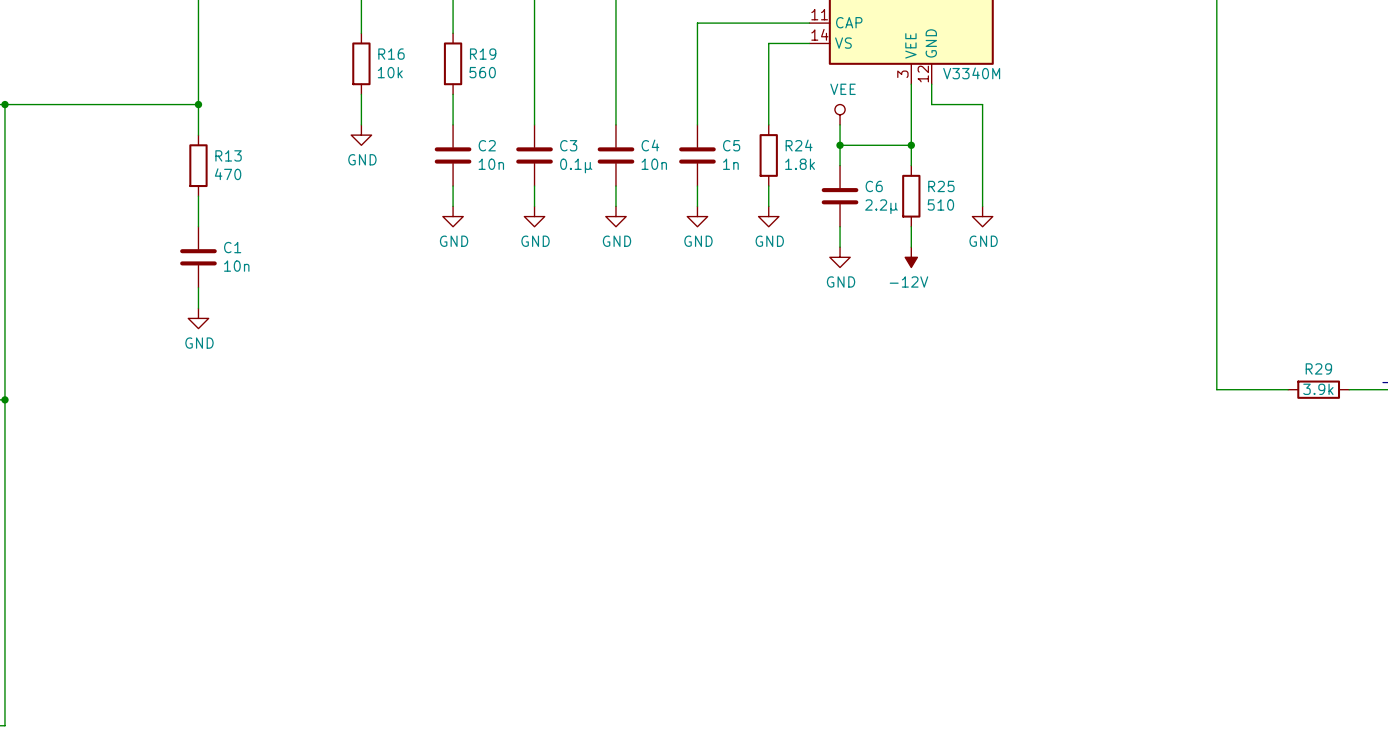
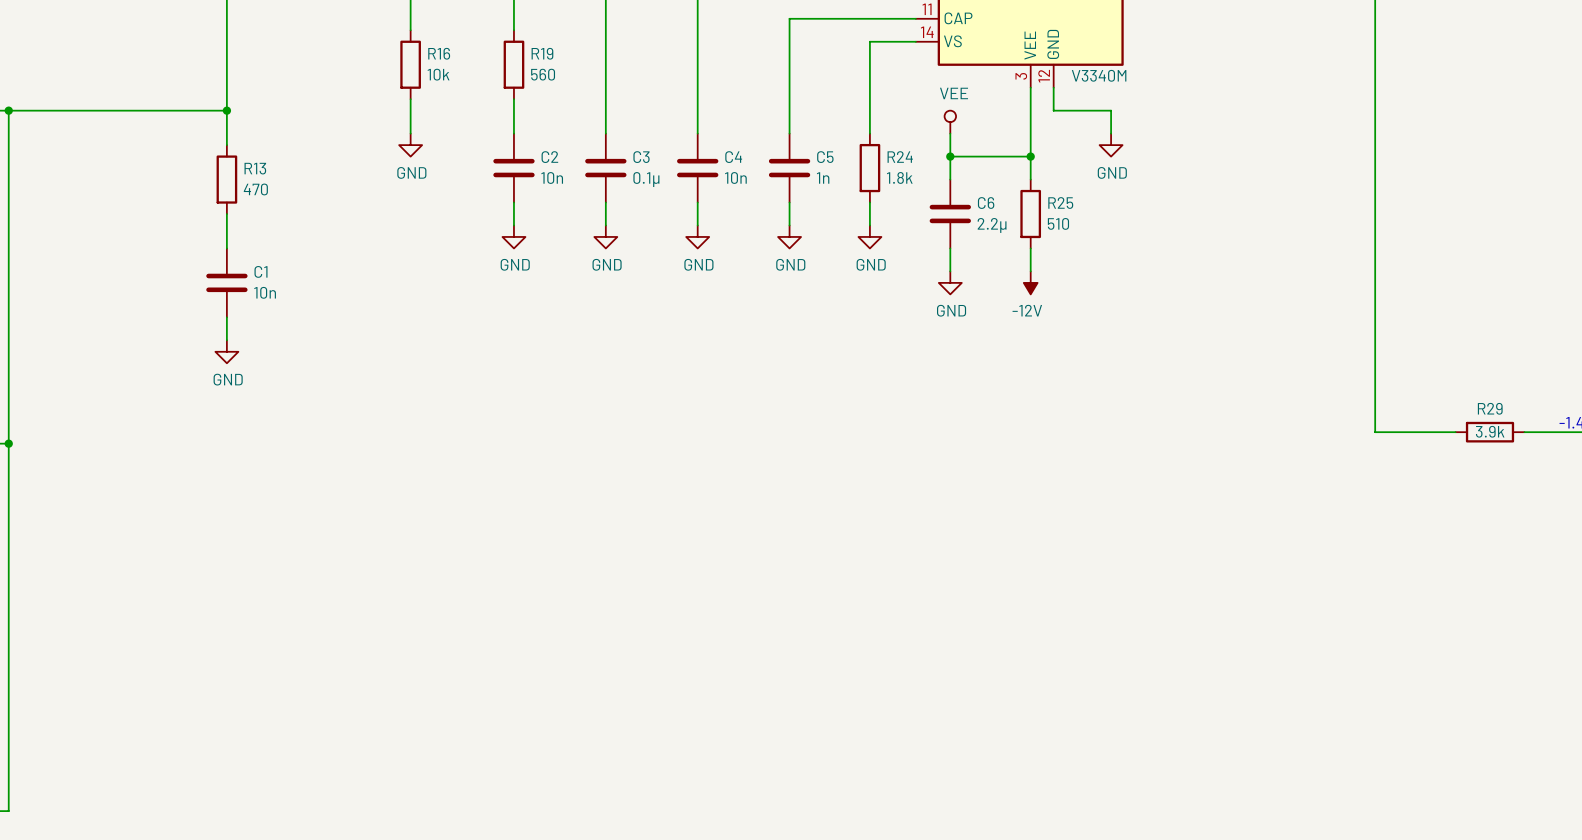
wire: (982, 124) (982, 206) -> none
power symbol position: GND (982, 216) -> GND (1111, 145)

